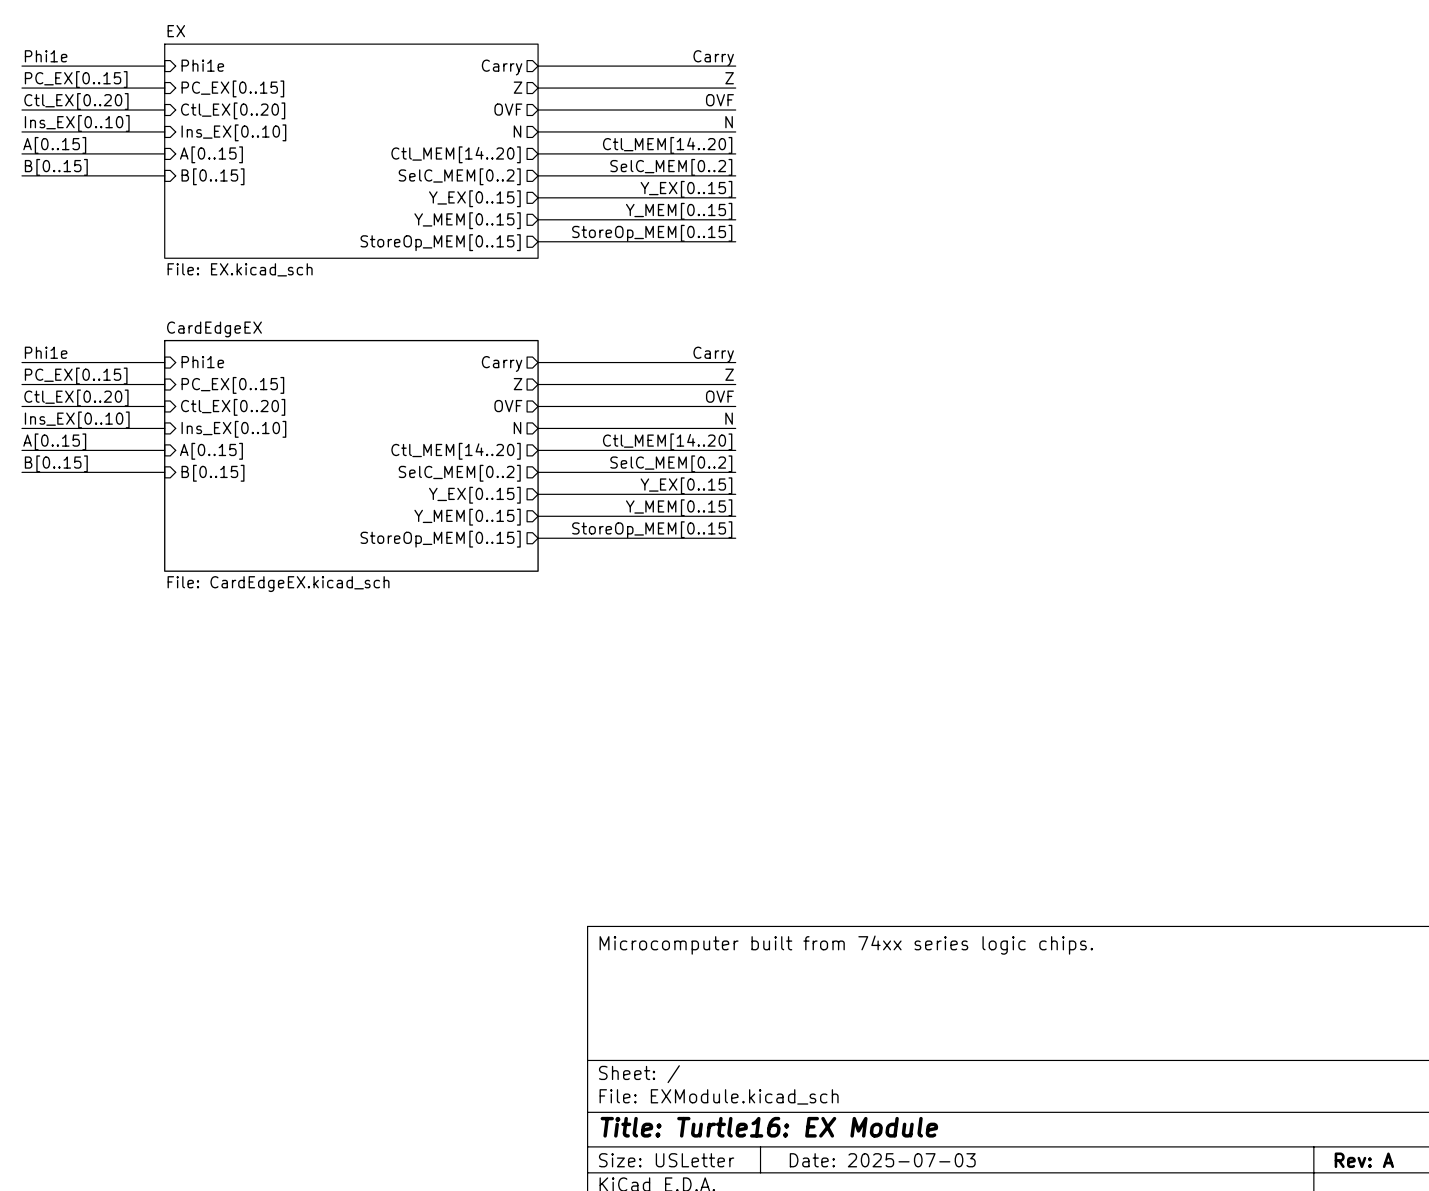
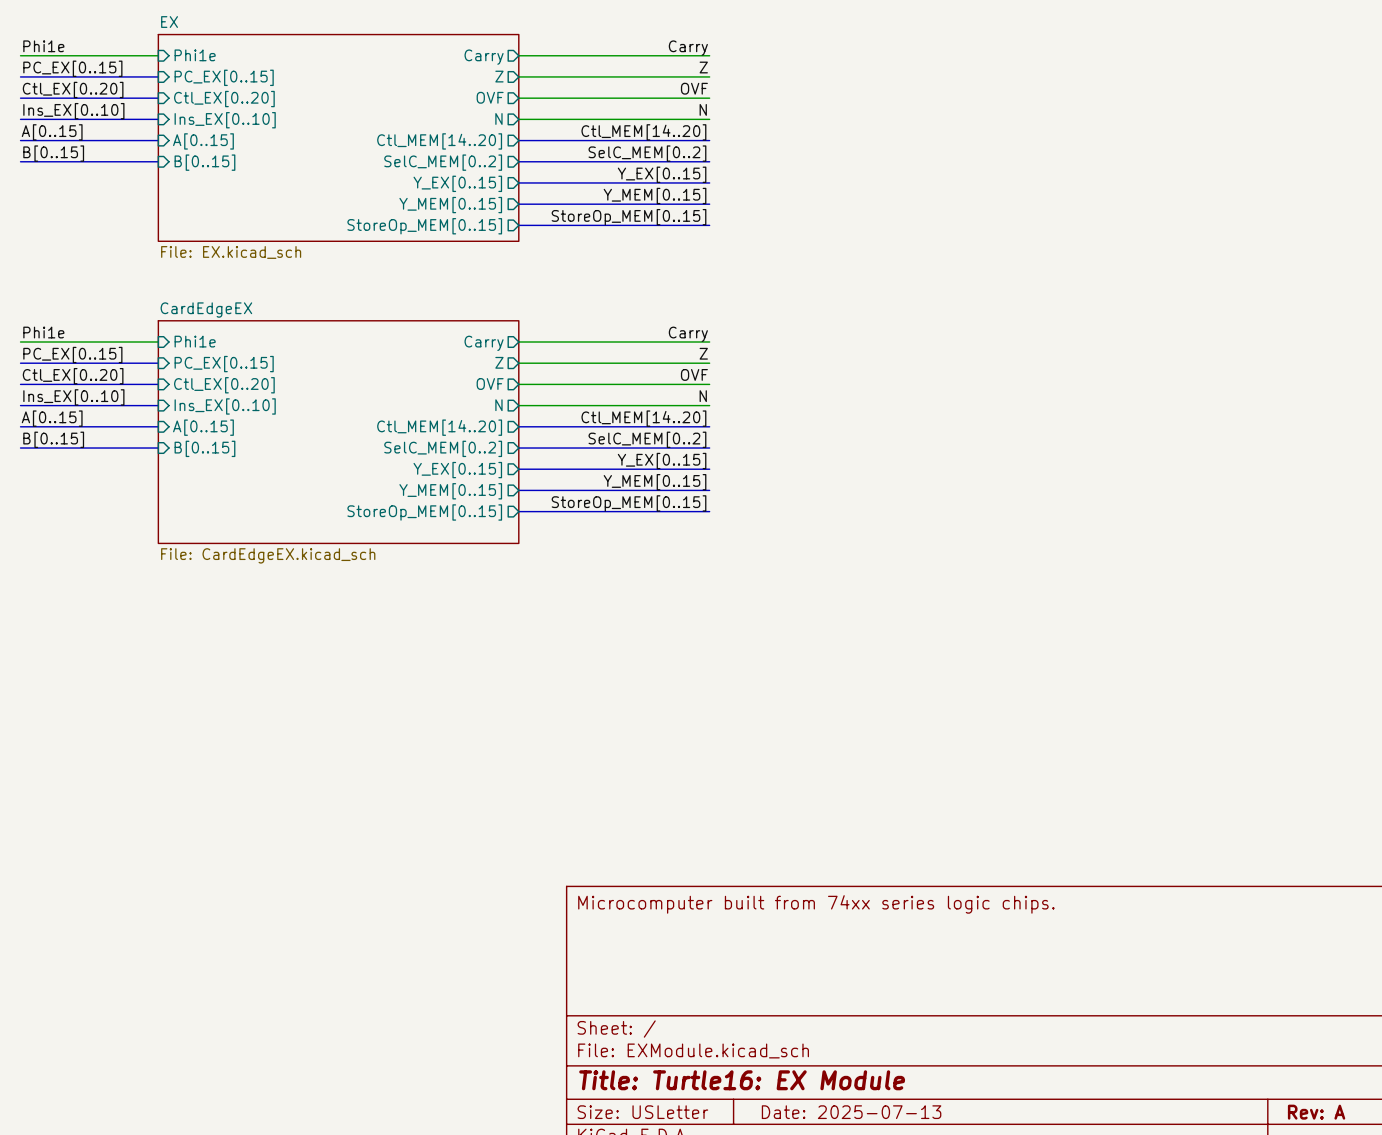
title block: Date: 2025-07-03 (882, 1160) -> Date: 2025-07-13 (851, 1112)

